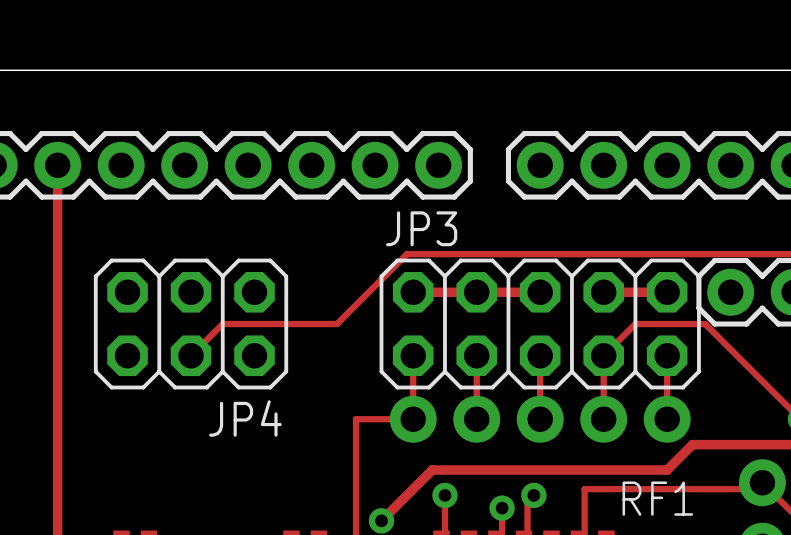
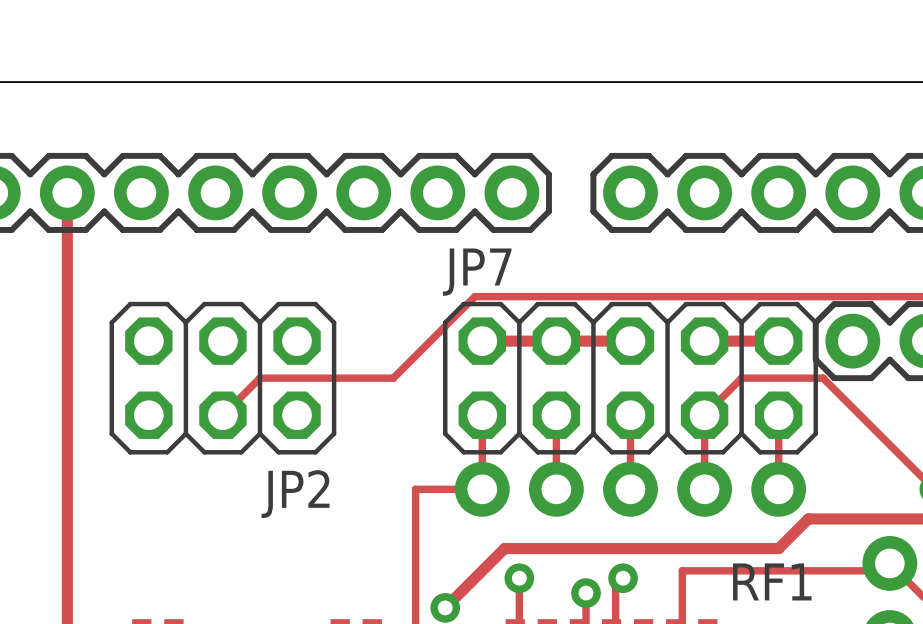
JP3 name: JP3 (421, 228) -> JP7 (477, 272)
JP4 name: JP4 (245, 418) -> JP2 (295, 494)

